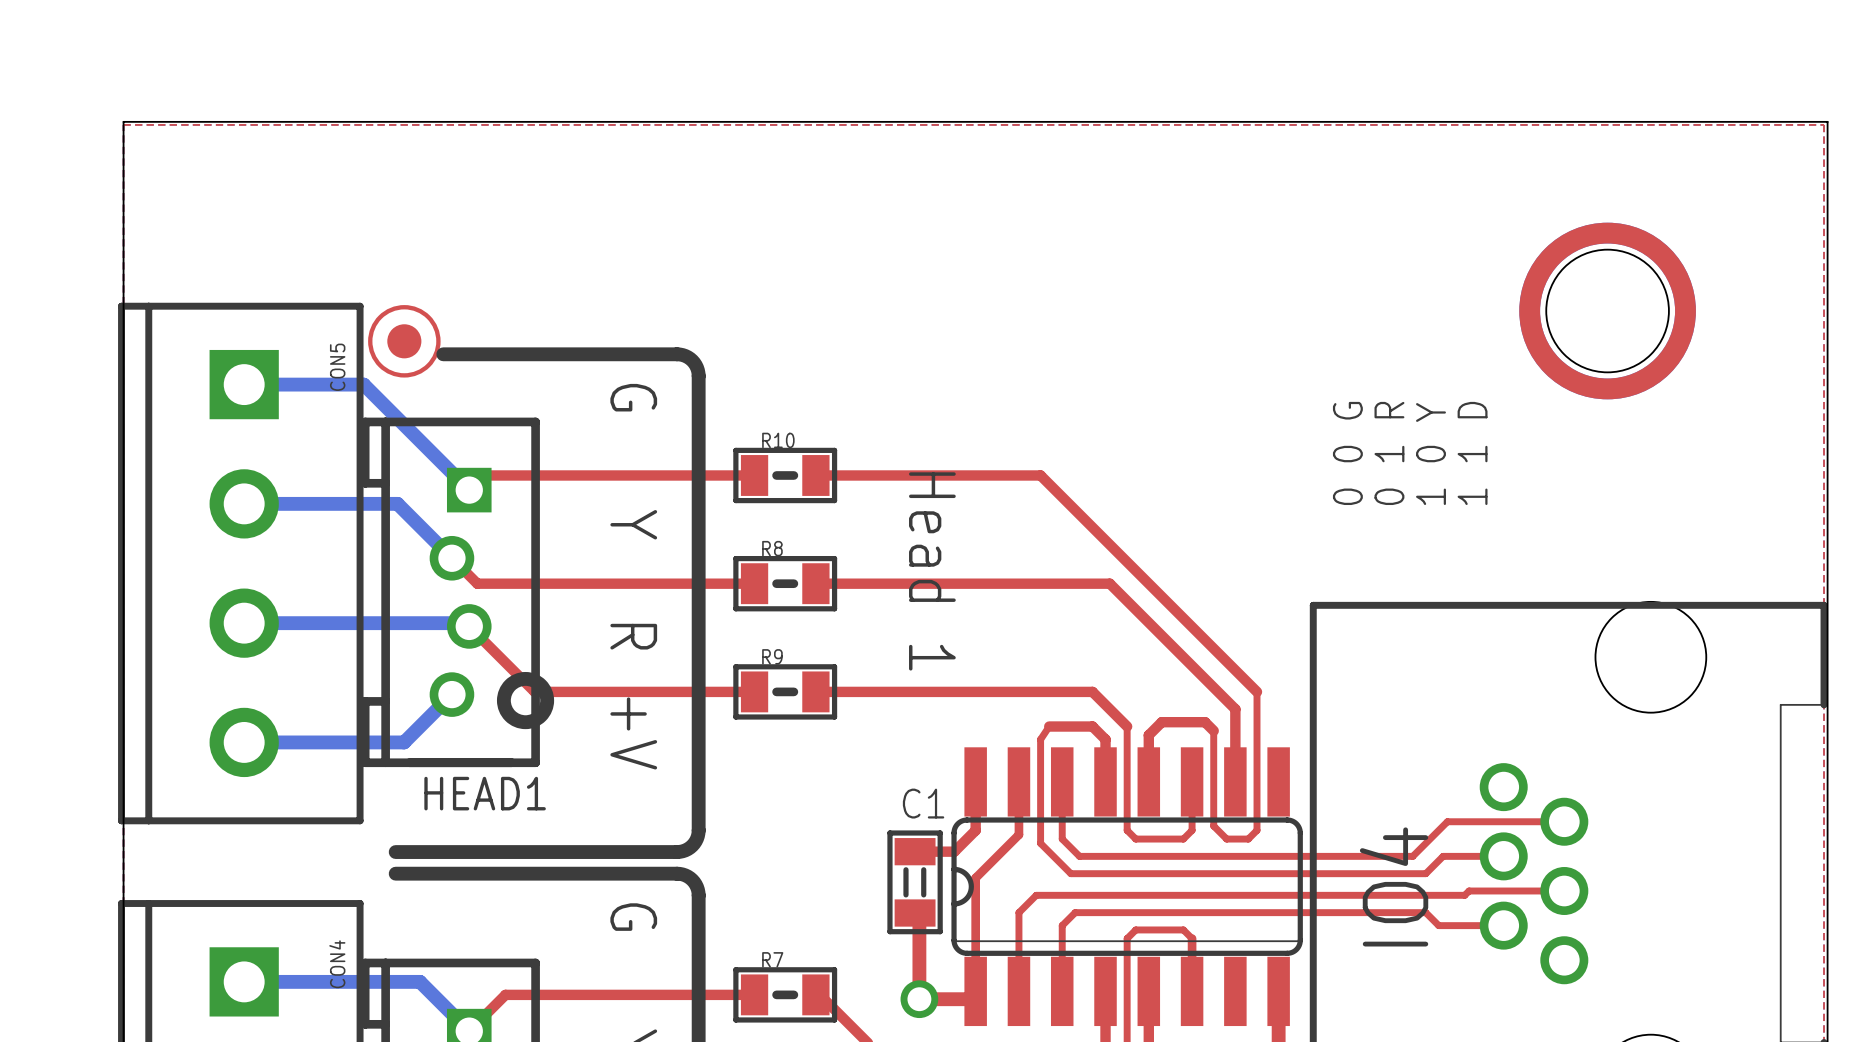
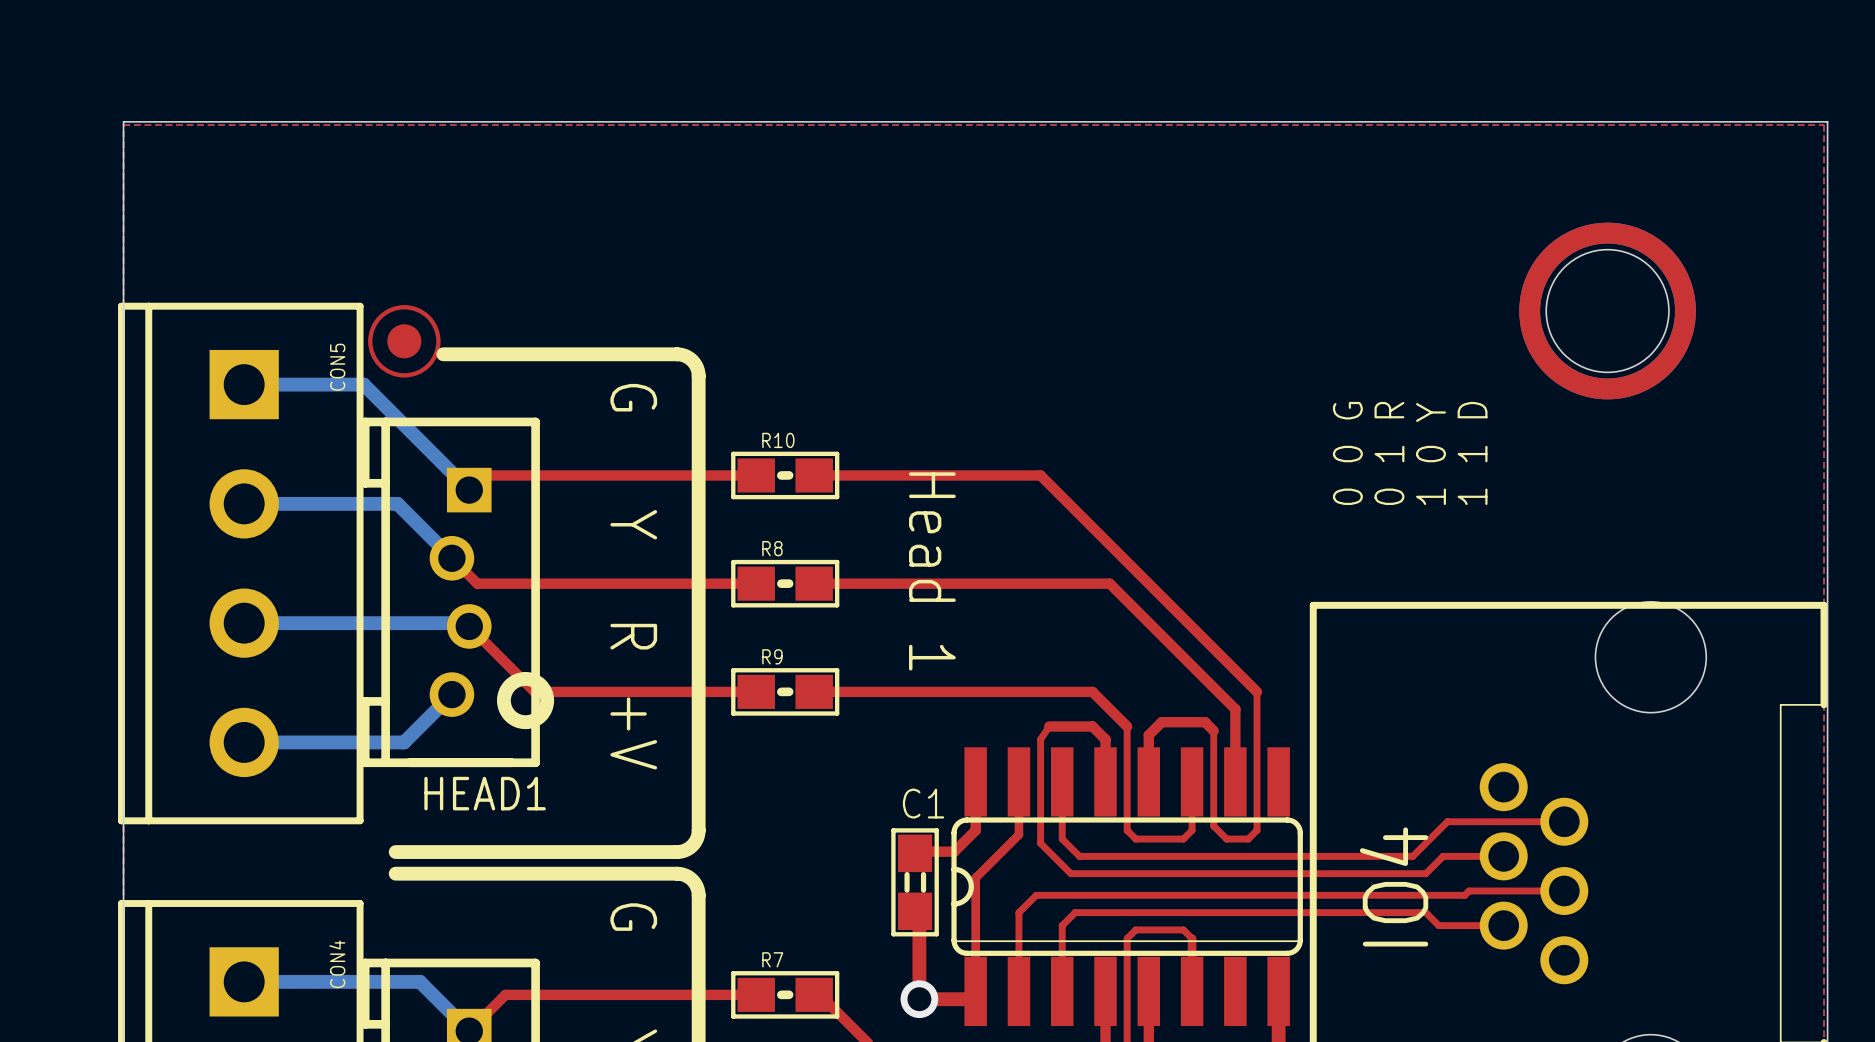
R10 footprint: [733, 447, 838, 504] -> [731, 451, 840, 500]
R8 footprint: [733, 555, 838, 612] -> [731, 559, 840, 608]
R9 footprint: [733, 664, 838, 720] -> [731, 668, 840, 716]
C1 footprint: [887, 830, 943, 935] -> [891, 828, 939, 937]
R7 footprint: [733, 967, 838, 1023] -> [731, 971, 840, 1019]

